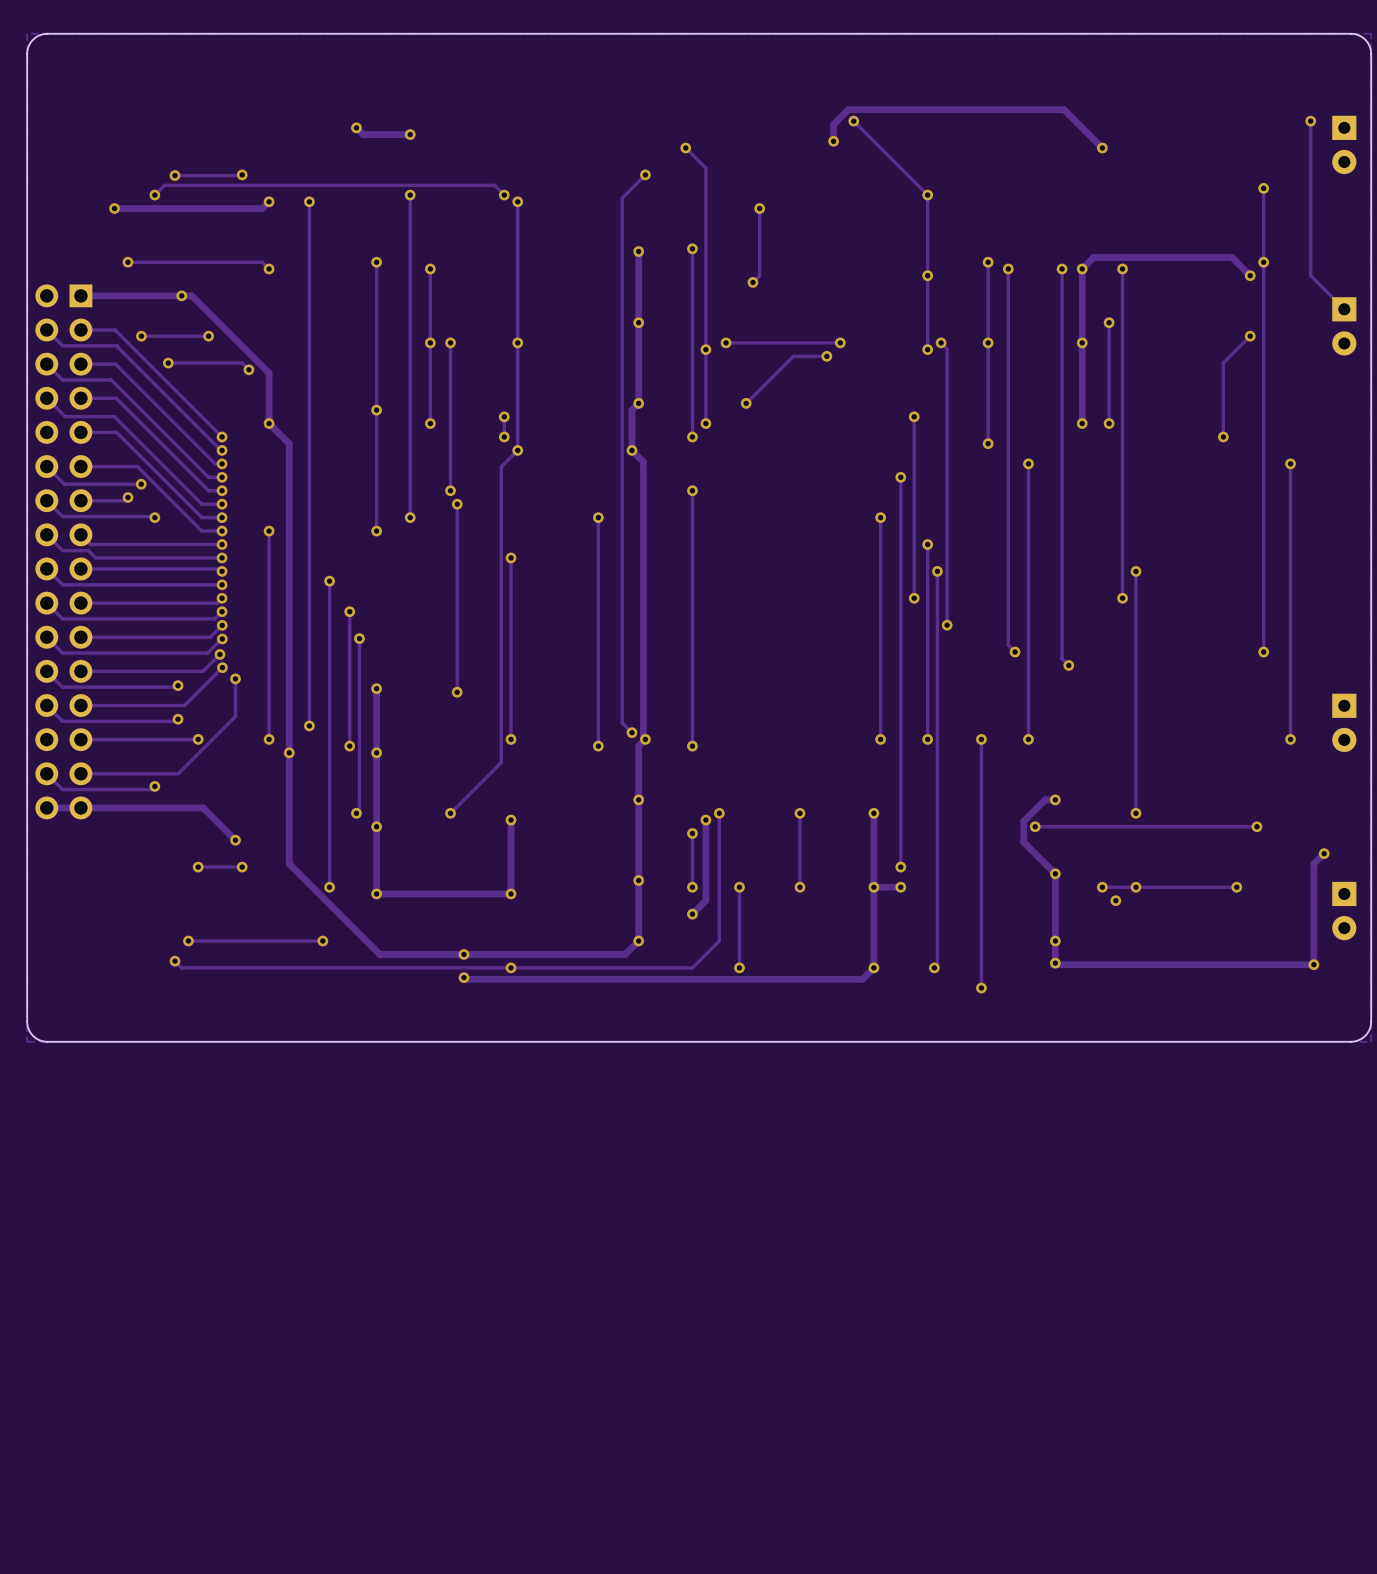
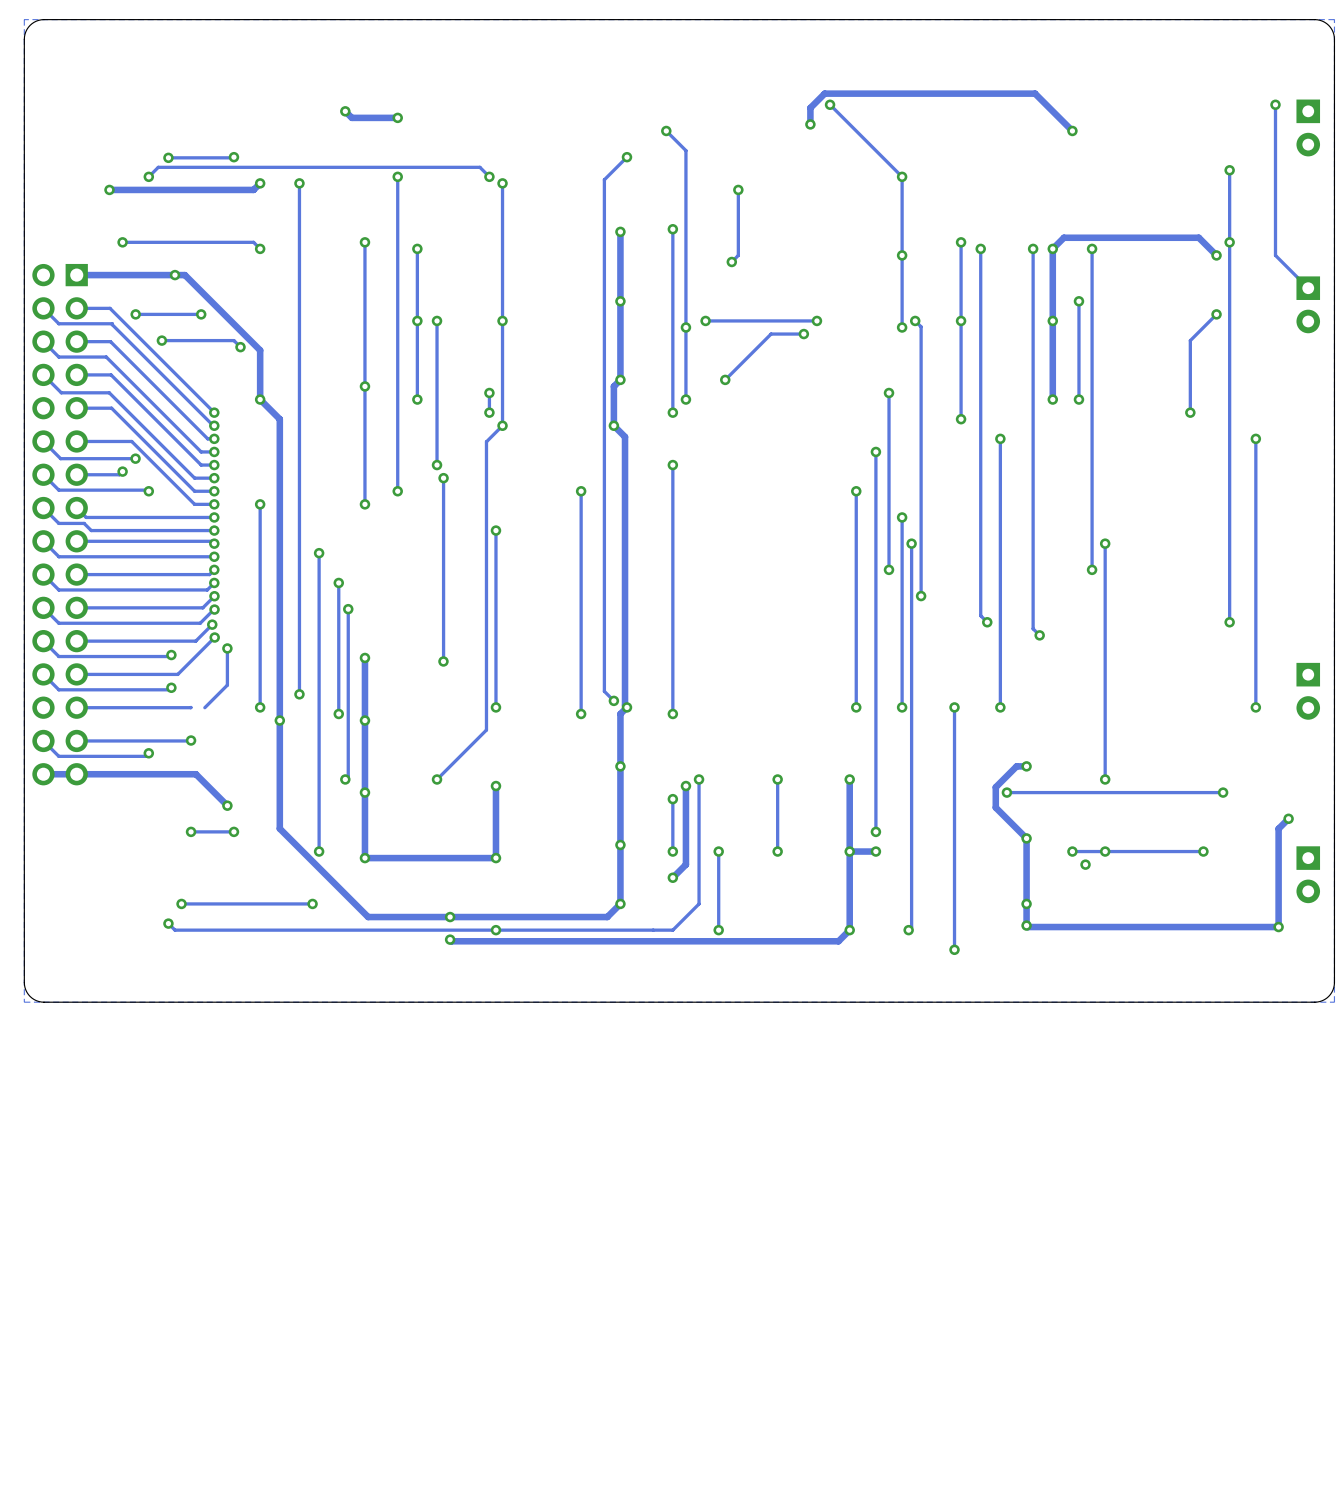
via position: (198, 739) -> (191, 740)
track: (212, 739) (178, 773) -> (191, 740) (171, 740)

